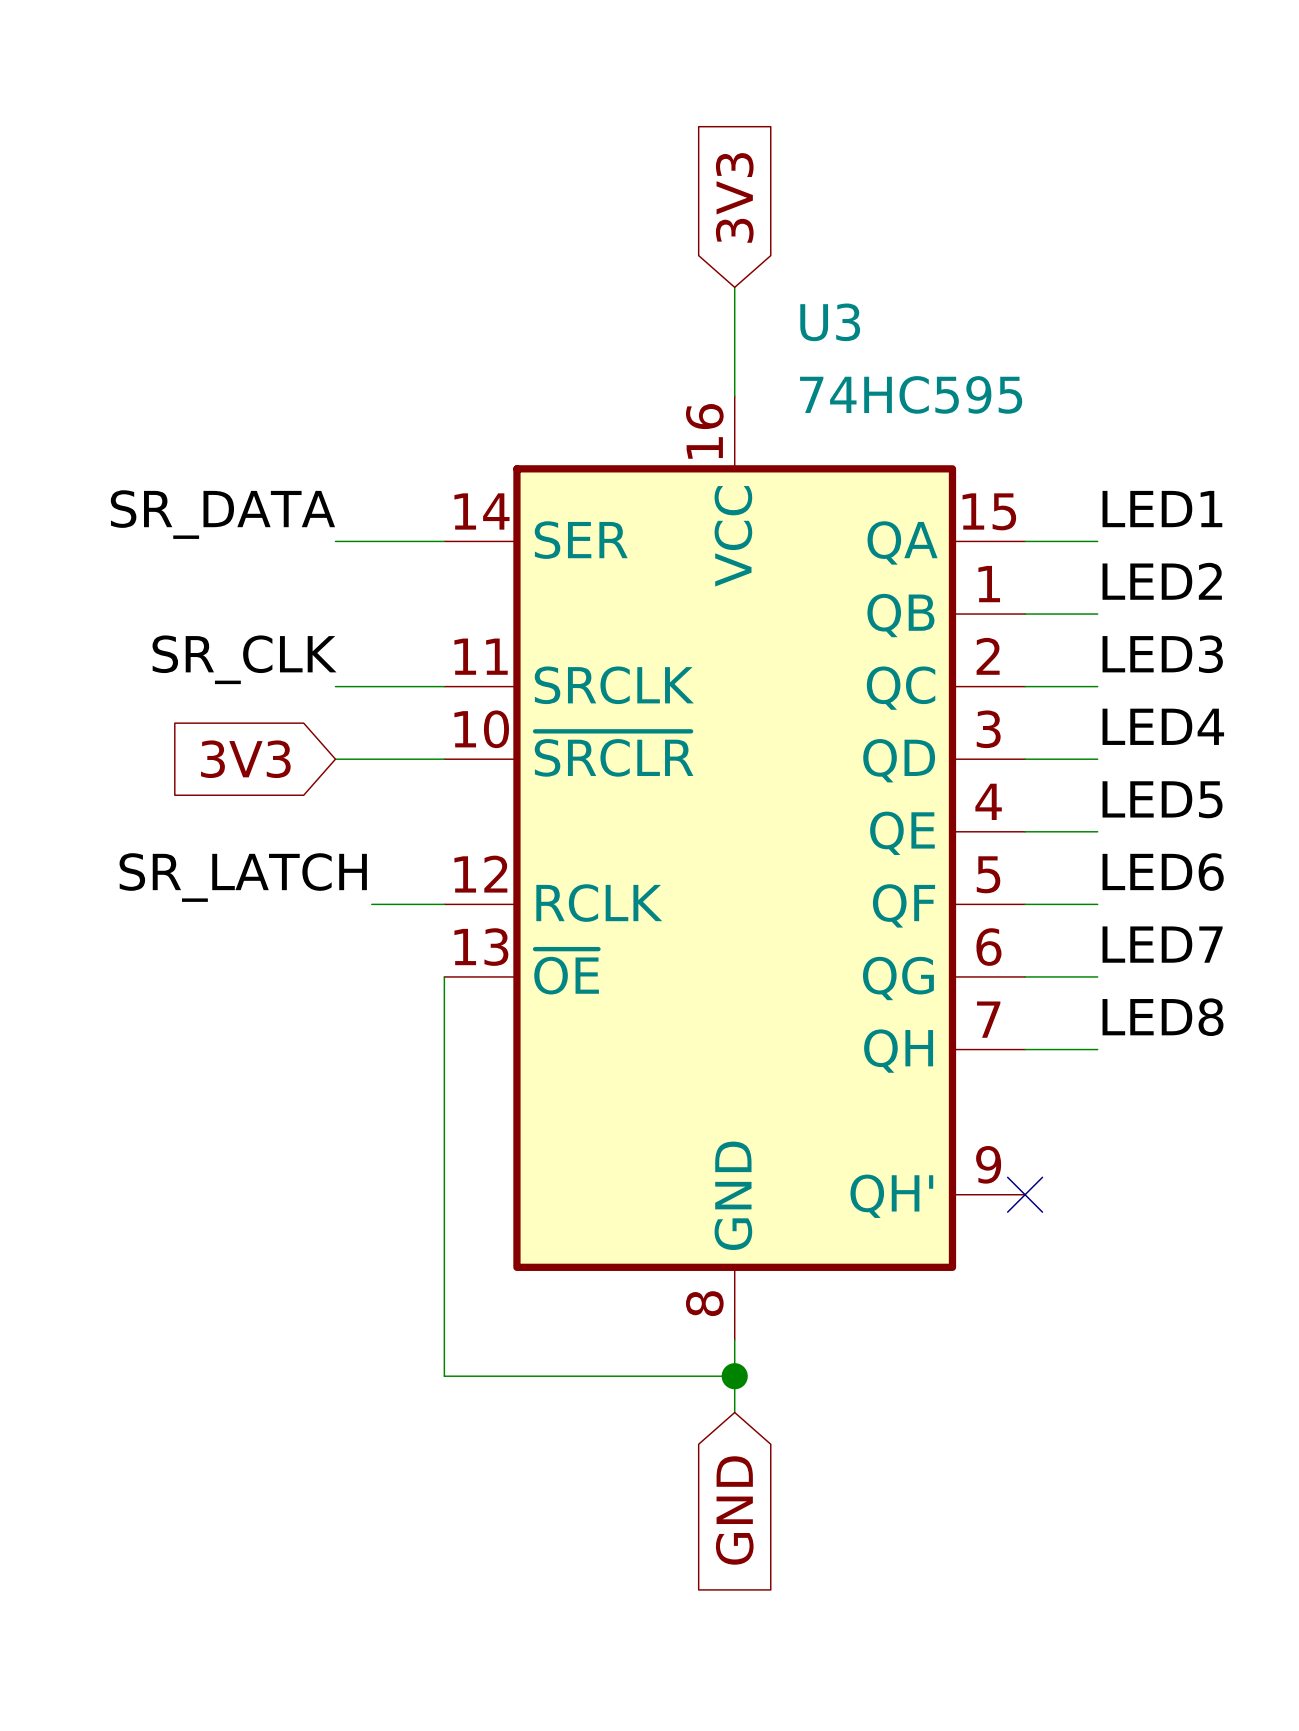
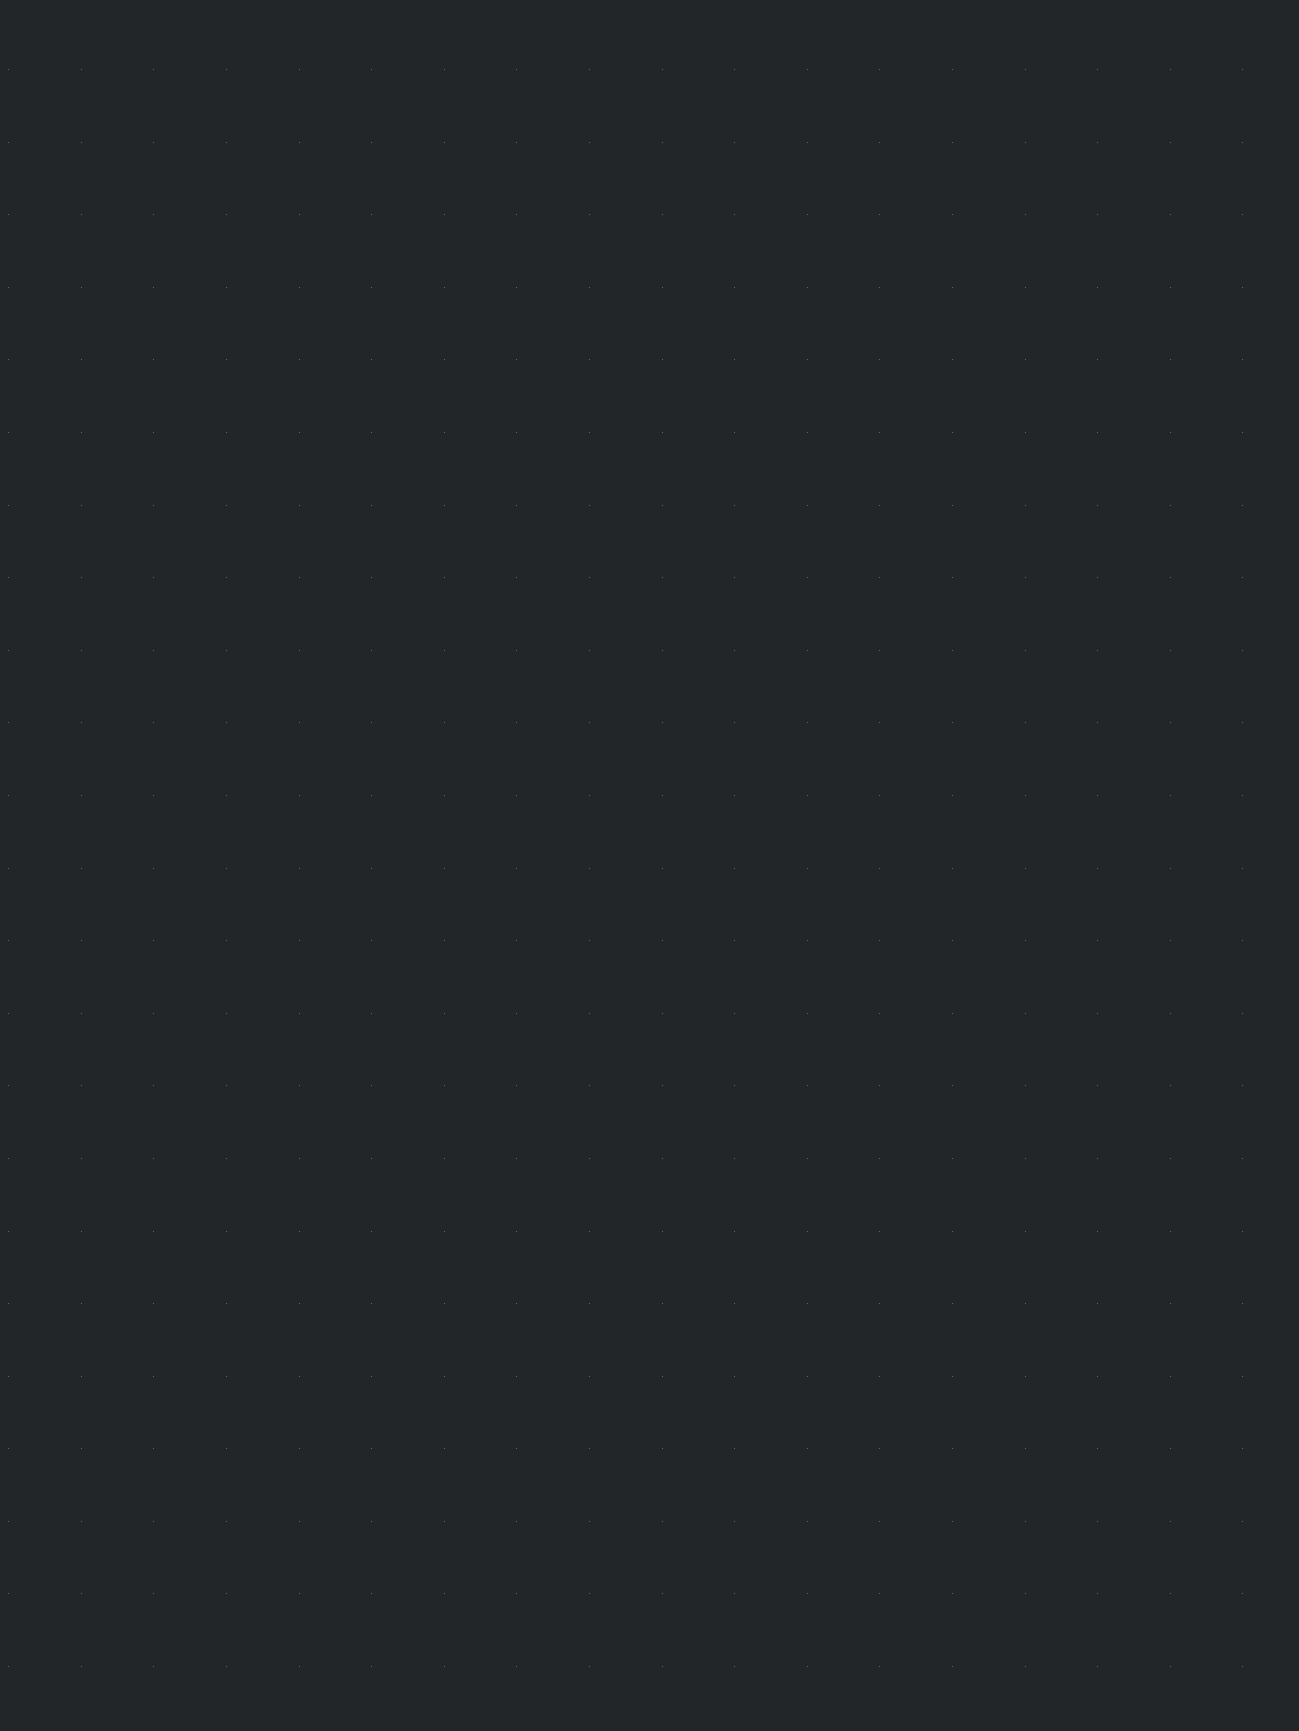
global label: 3V3 (734, 197) -> none
wire: (734, 287) (734, 396) -> none
label: LED1 (1162, 509) -> none
label: SR_DATA (222, 514) -> none
wire: (335, 541) (444, 541) -> none
wire: (1025, 541) (1097, 541) -> none
label: LED2 (1162, 581) -> none
wire: (1025, 614) (1097, 614) -> none
label: LED3 (1162, 654) -> none
label: SR_CLK (244, 659) -> none
wire: (335, 686) (444, 686) -> none
wire: (1025, 686) (1097, 686) -> none
label: LED4 (1163, 726) -> none
global label: 3V3 (245, 759) -> none
wire: (335, 759) (444, 759) -> none
wire: (1025, 759) (1097, 759) -> none
label: LED5 (1162, 799) -> none
wire: (1025, 831) (1097, 831) -> none
U3: 74HC595 (734, 868) -> none
label: LED6 (1163, 872) -> none
label: SR_LATCH (243, 877) -> none
wire: (371, 904) (444, 904) -> none
wire: (1025, 904) (1097, 904) -> none
label: LED7 (1162, 944) -> none
wire: (444, 976) (444, 1376) (734, 1376) -> none
wire: (1025, 976) (1097, 976) -> none
label: LED8 (1163, 1017) -> none
wire: (1025, 1049) (1097, 1049) -> none
no-connect mark: (1025, 1194) -> none
wire: (734, 1339) (734, 1412) -> none
junction: (734, 1376) -> none
global label: GND (734, 1510) -> none

